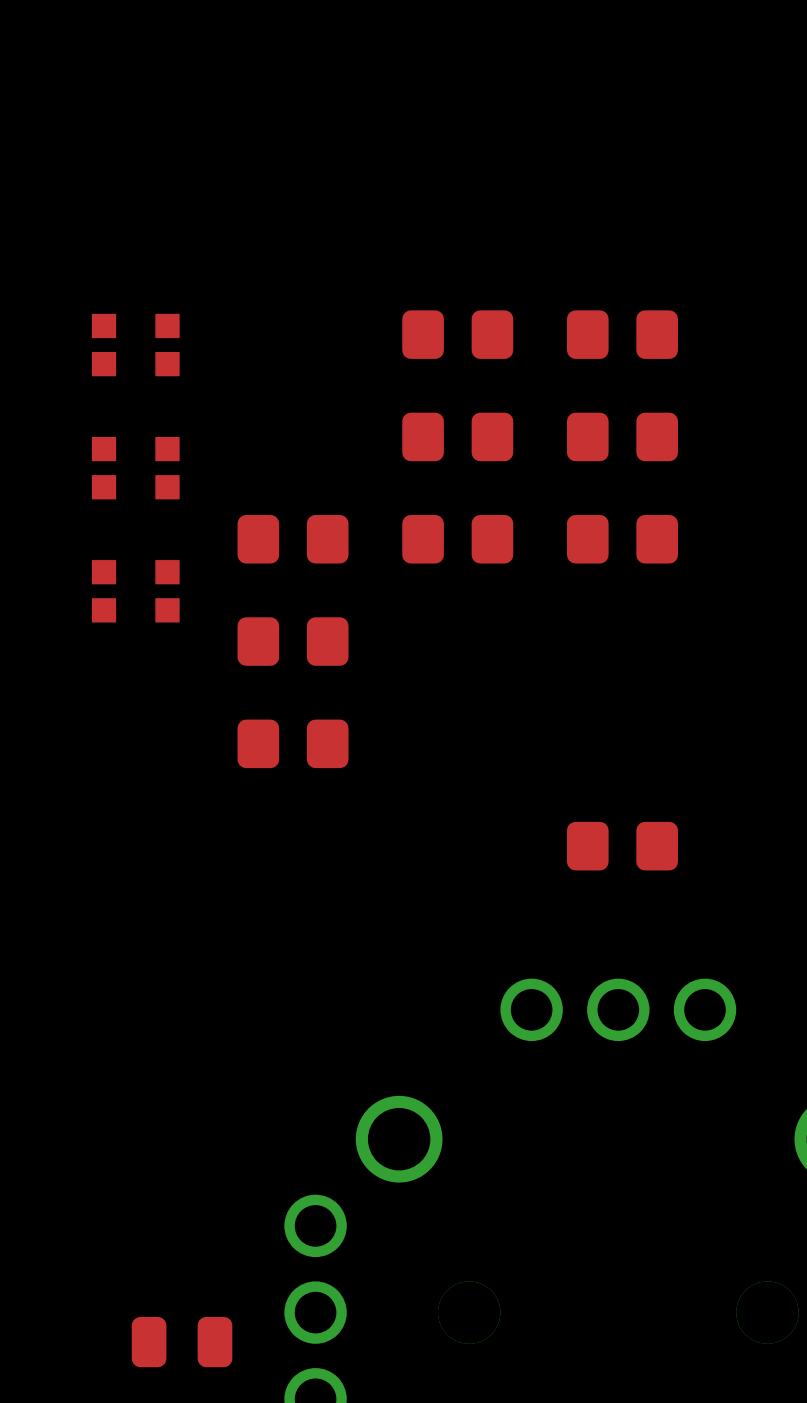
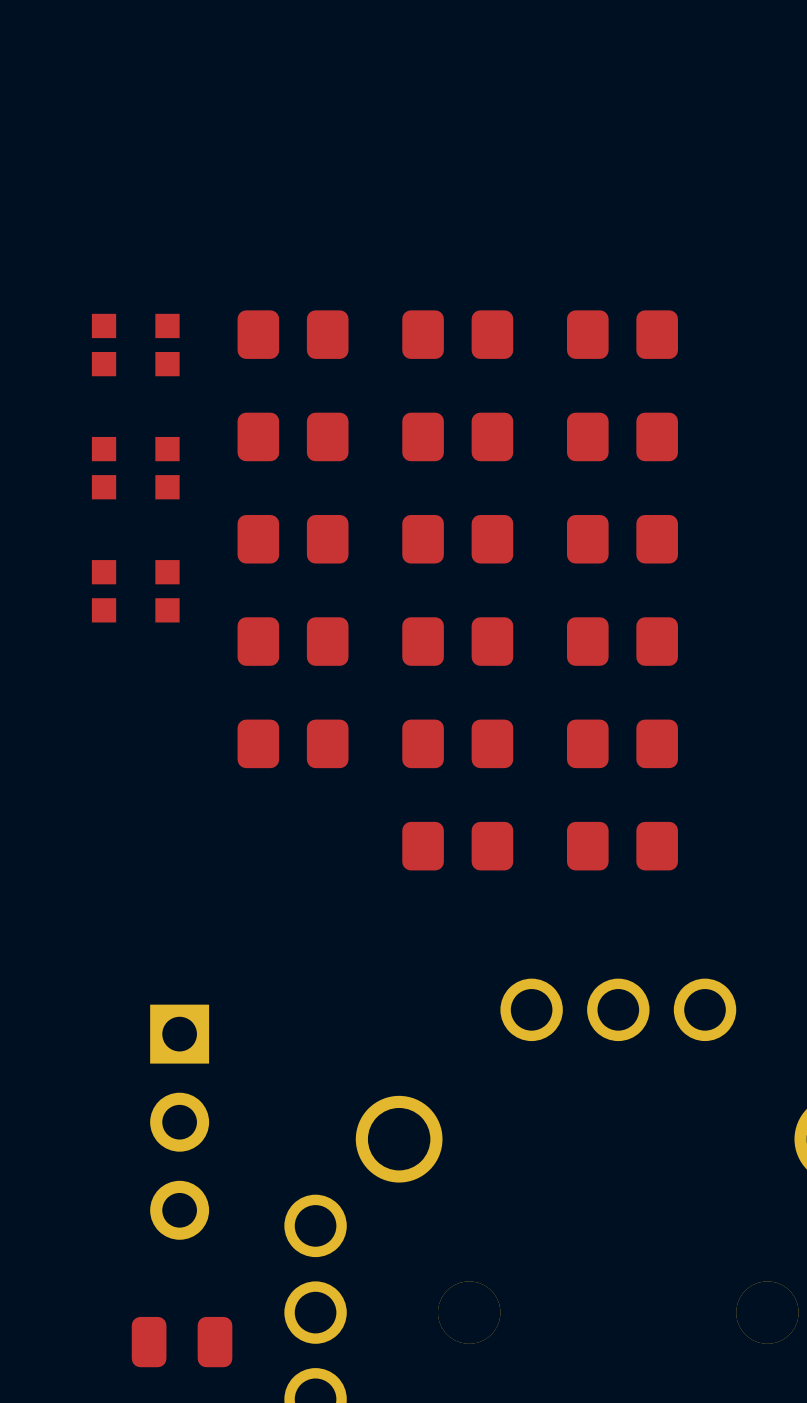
part: none -> (293, 334)
part: none -> (293, 436)
part: none -> (457, 641)
part: none -> (622, 641)
part: none -> (457, 743)
part: none -> (622, 743)
part: none -> (457, 846)
part: none -> (179, 1122)

